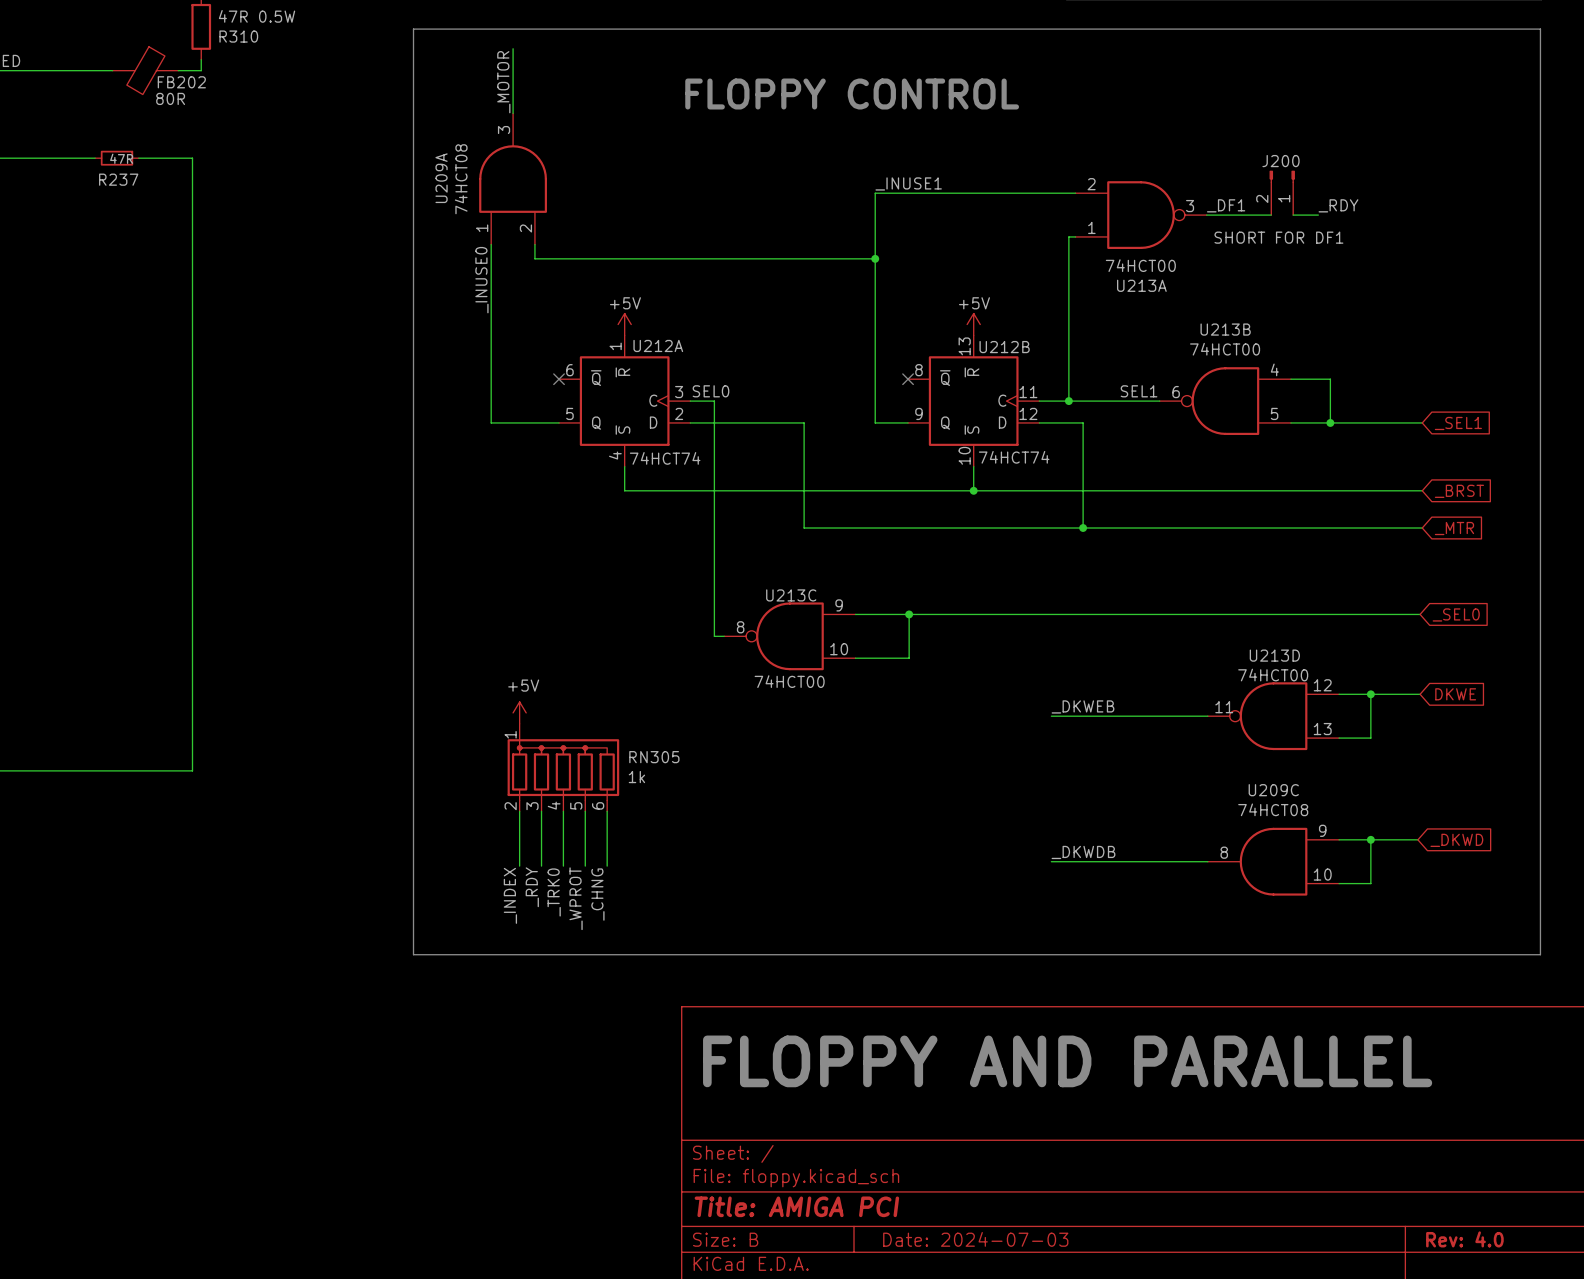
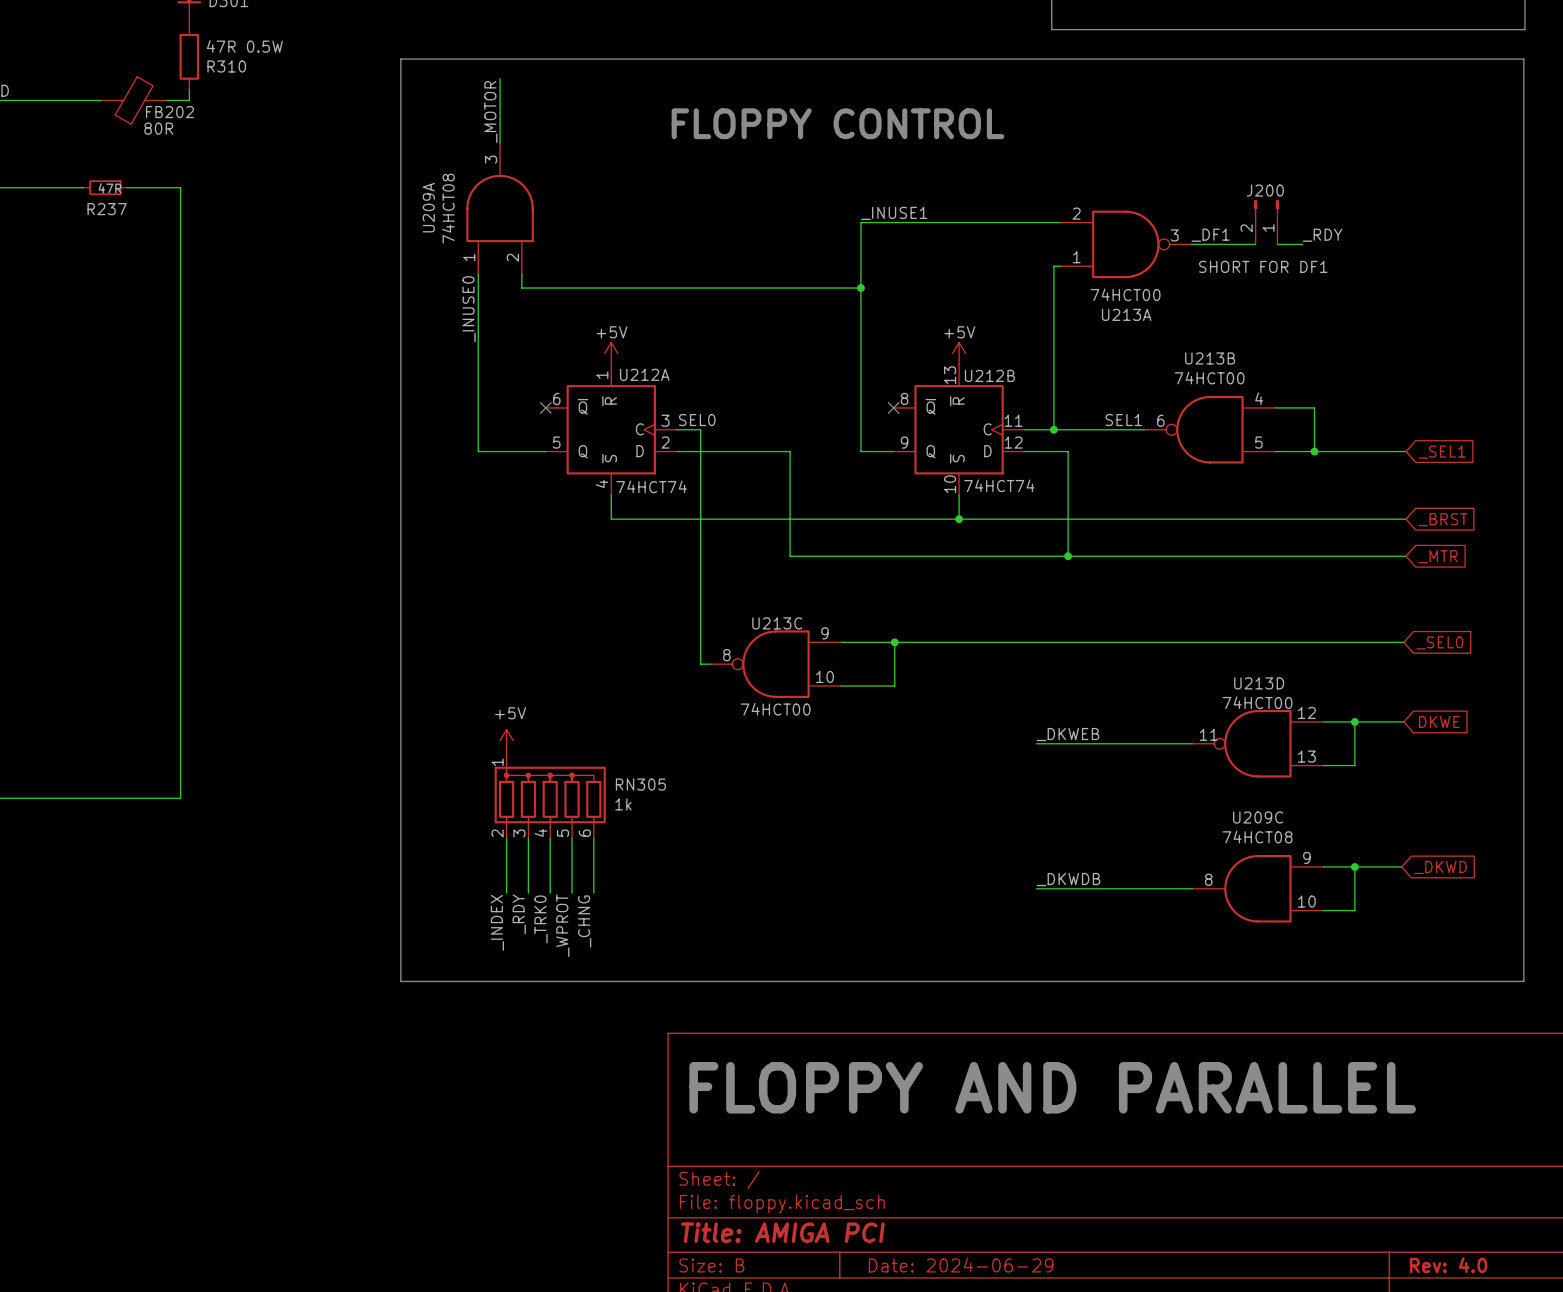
title block: Date: 2024-07-03 (975, 1239) -> Date: 2024-06-29 (961, 1265)

